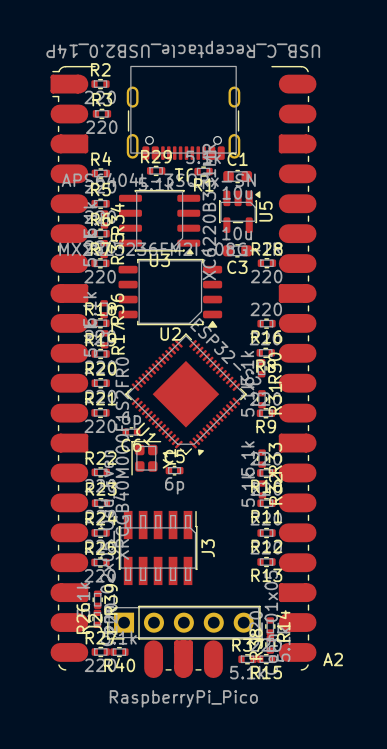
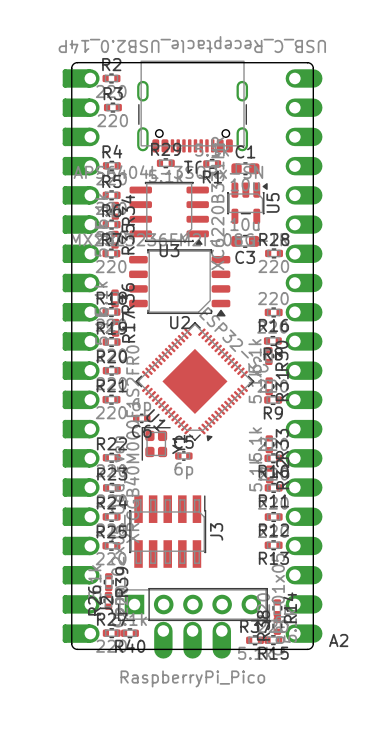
A2 footprint: [50, 65, 317, 679] -> [62, 62, 323, 659]

